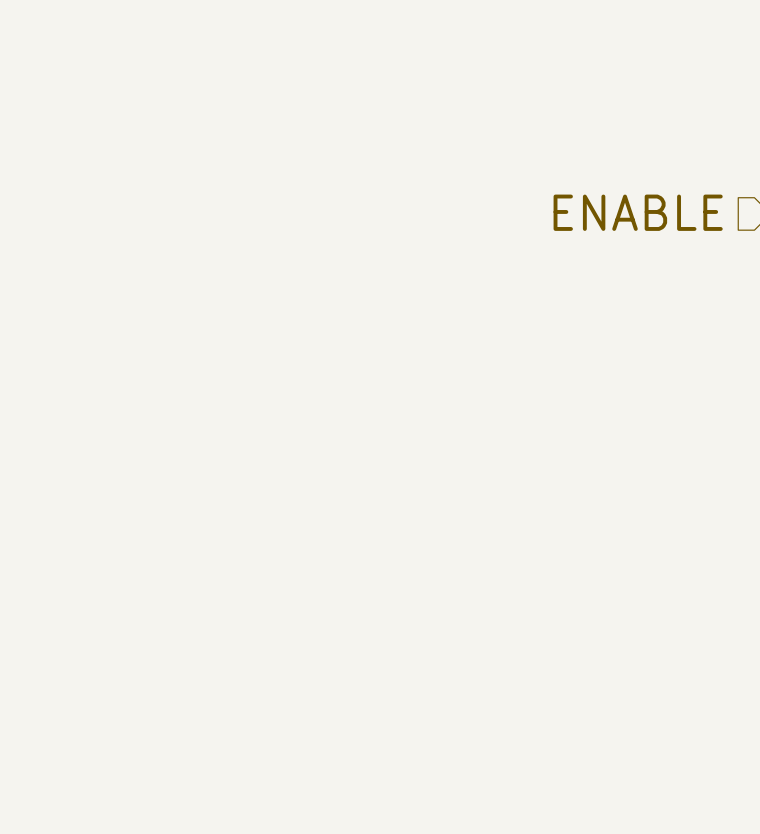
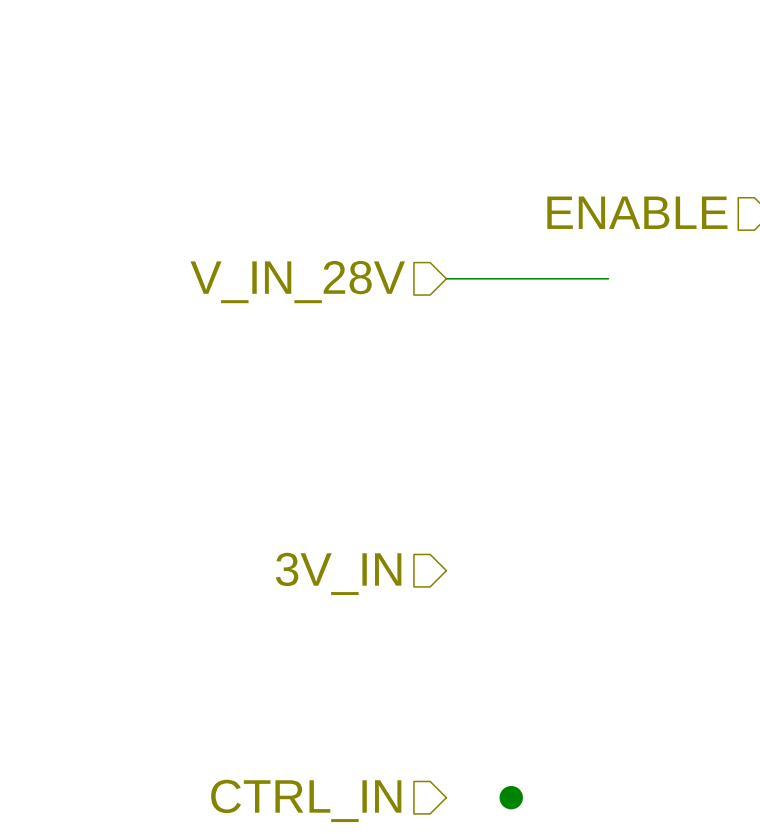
wire: none -> (446, 278) (608, 278)
hierarchical label: none -> V_IN_28V (297, 282)
hierarchical label: none -> 3V_IN (338, 573)
junction: none -> (511, 797)
hierarchical label: none -> CTRL_IN (306, 800)

